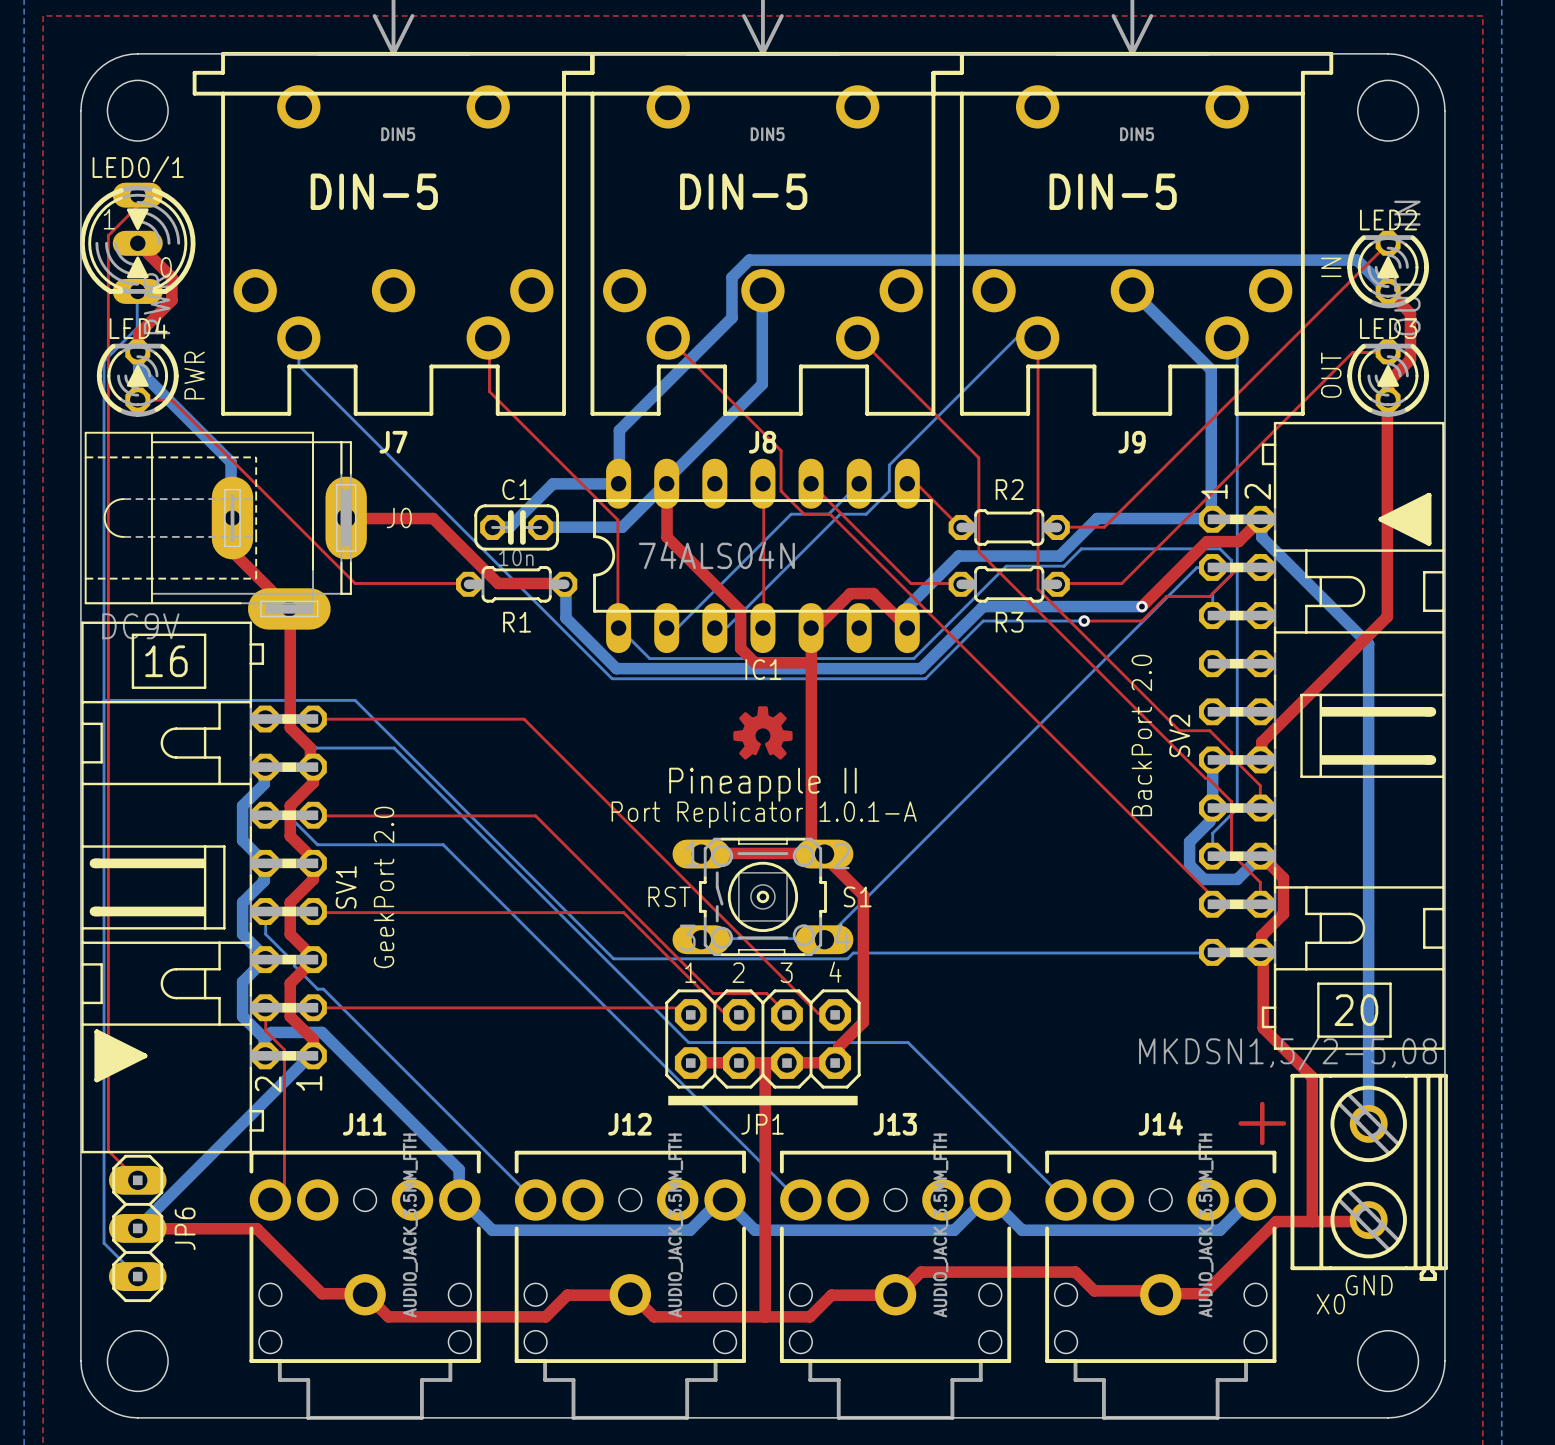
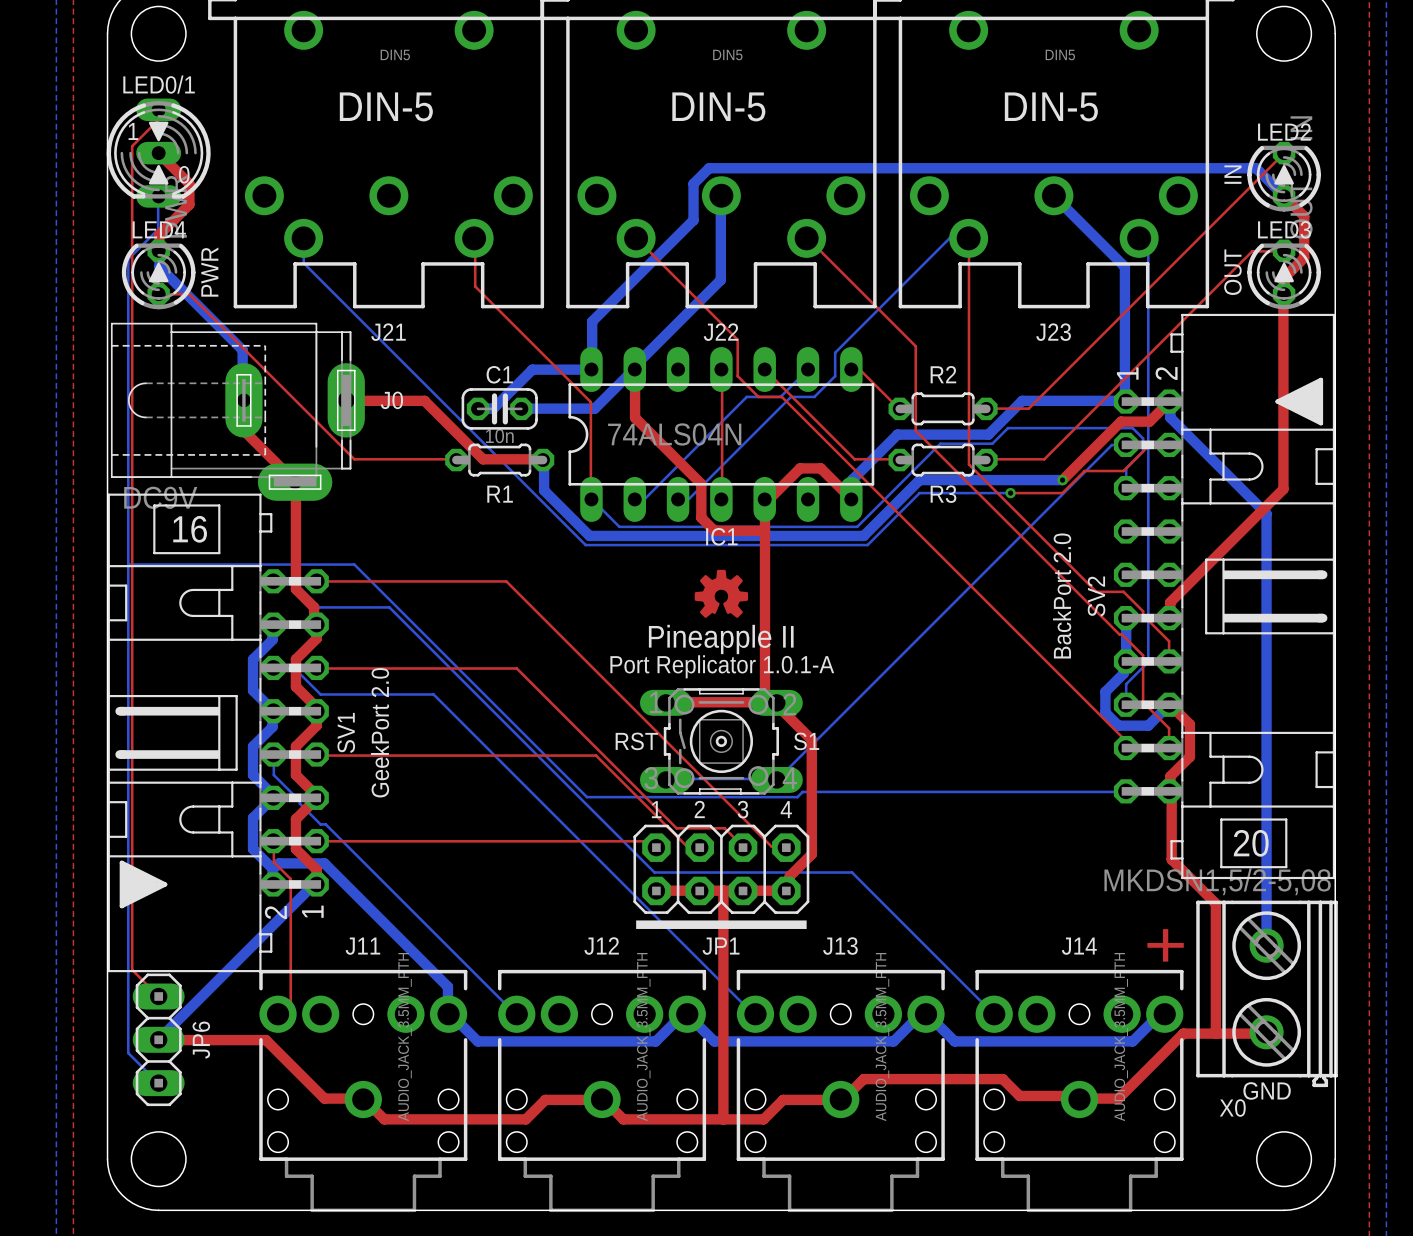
J7 name: J7 (393, 442) -> J21 (388, 332)
J8 name: J8 (762, 442) -> J22 (721, 332)
J9 name: J9 (1131, 442) -> J23 (1053, 332)

